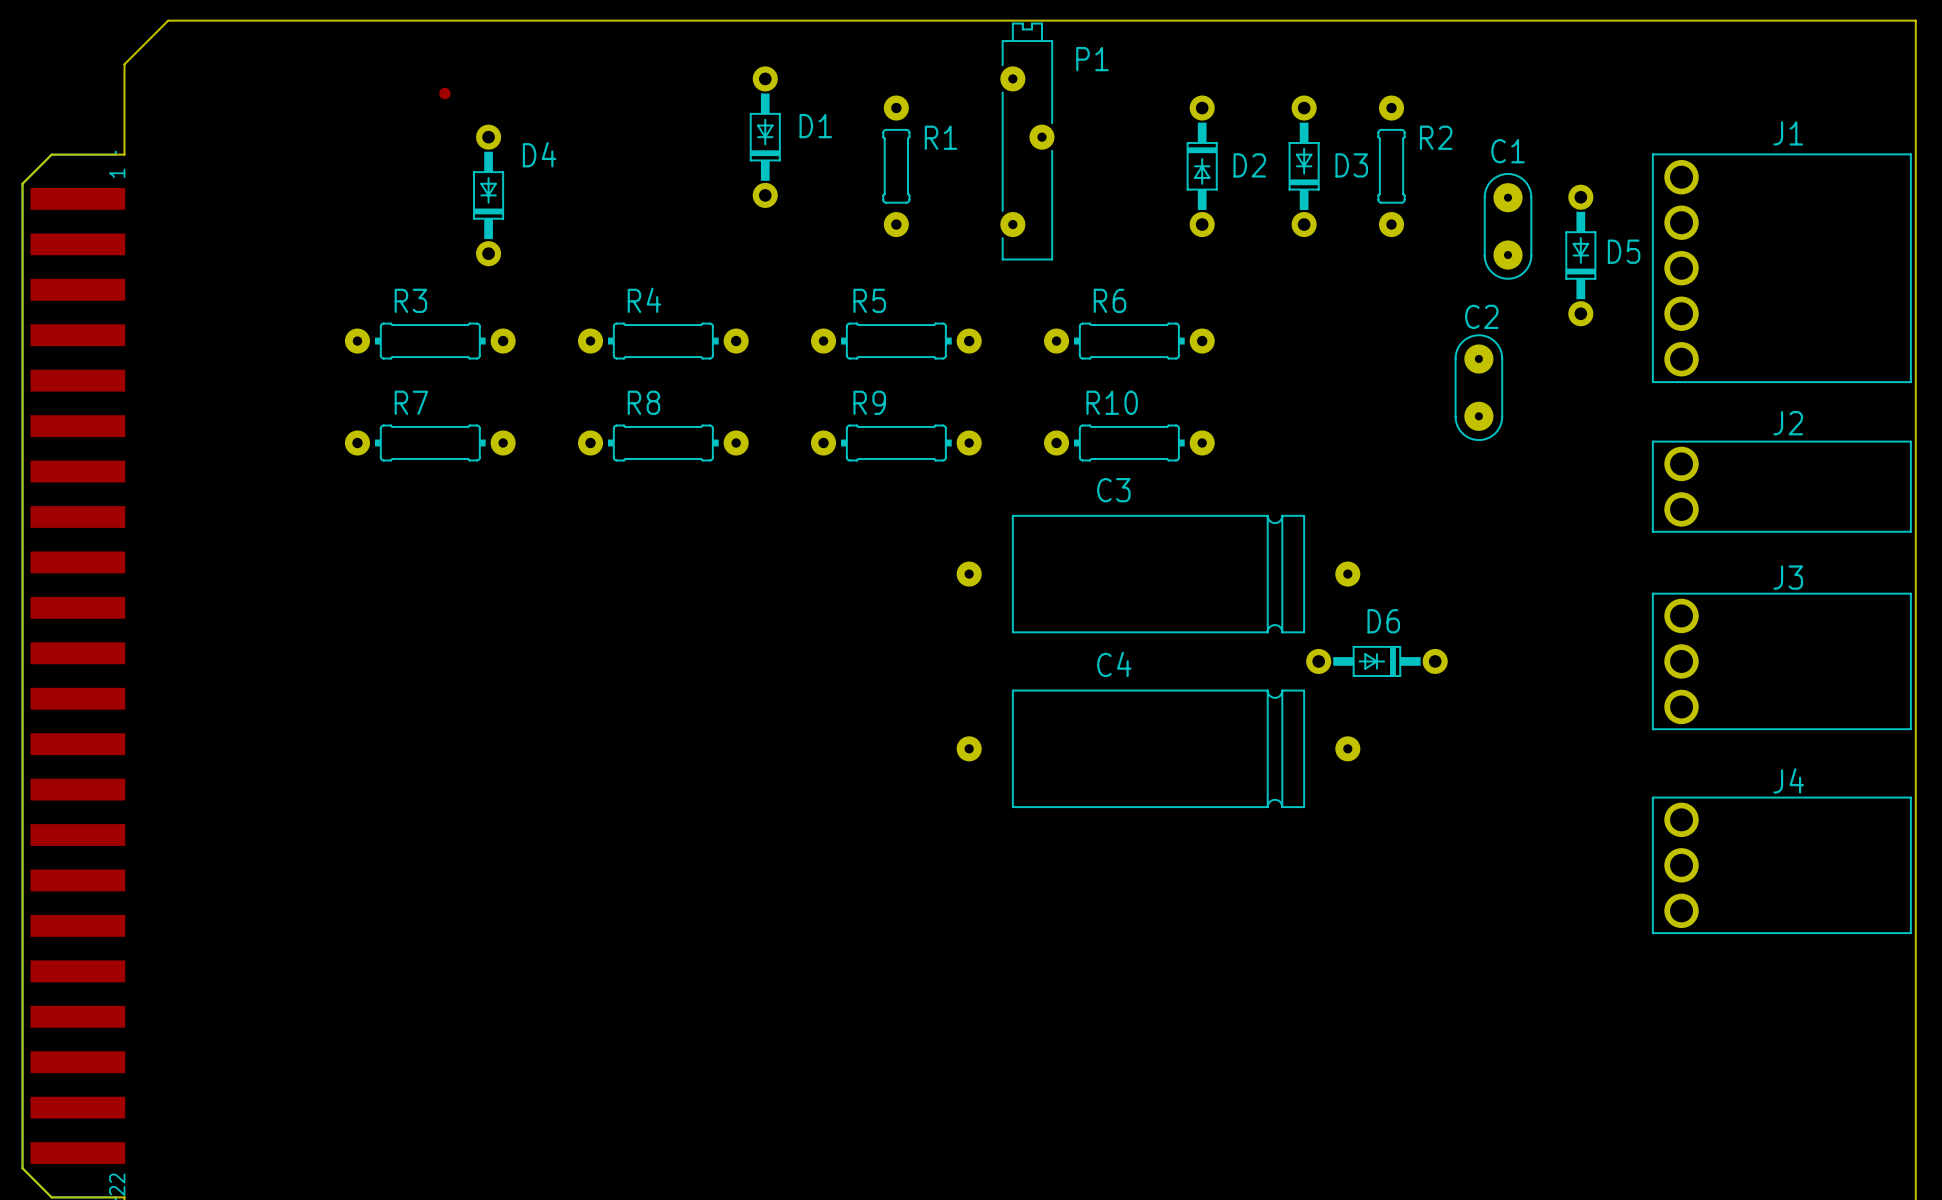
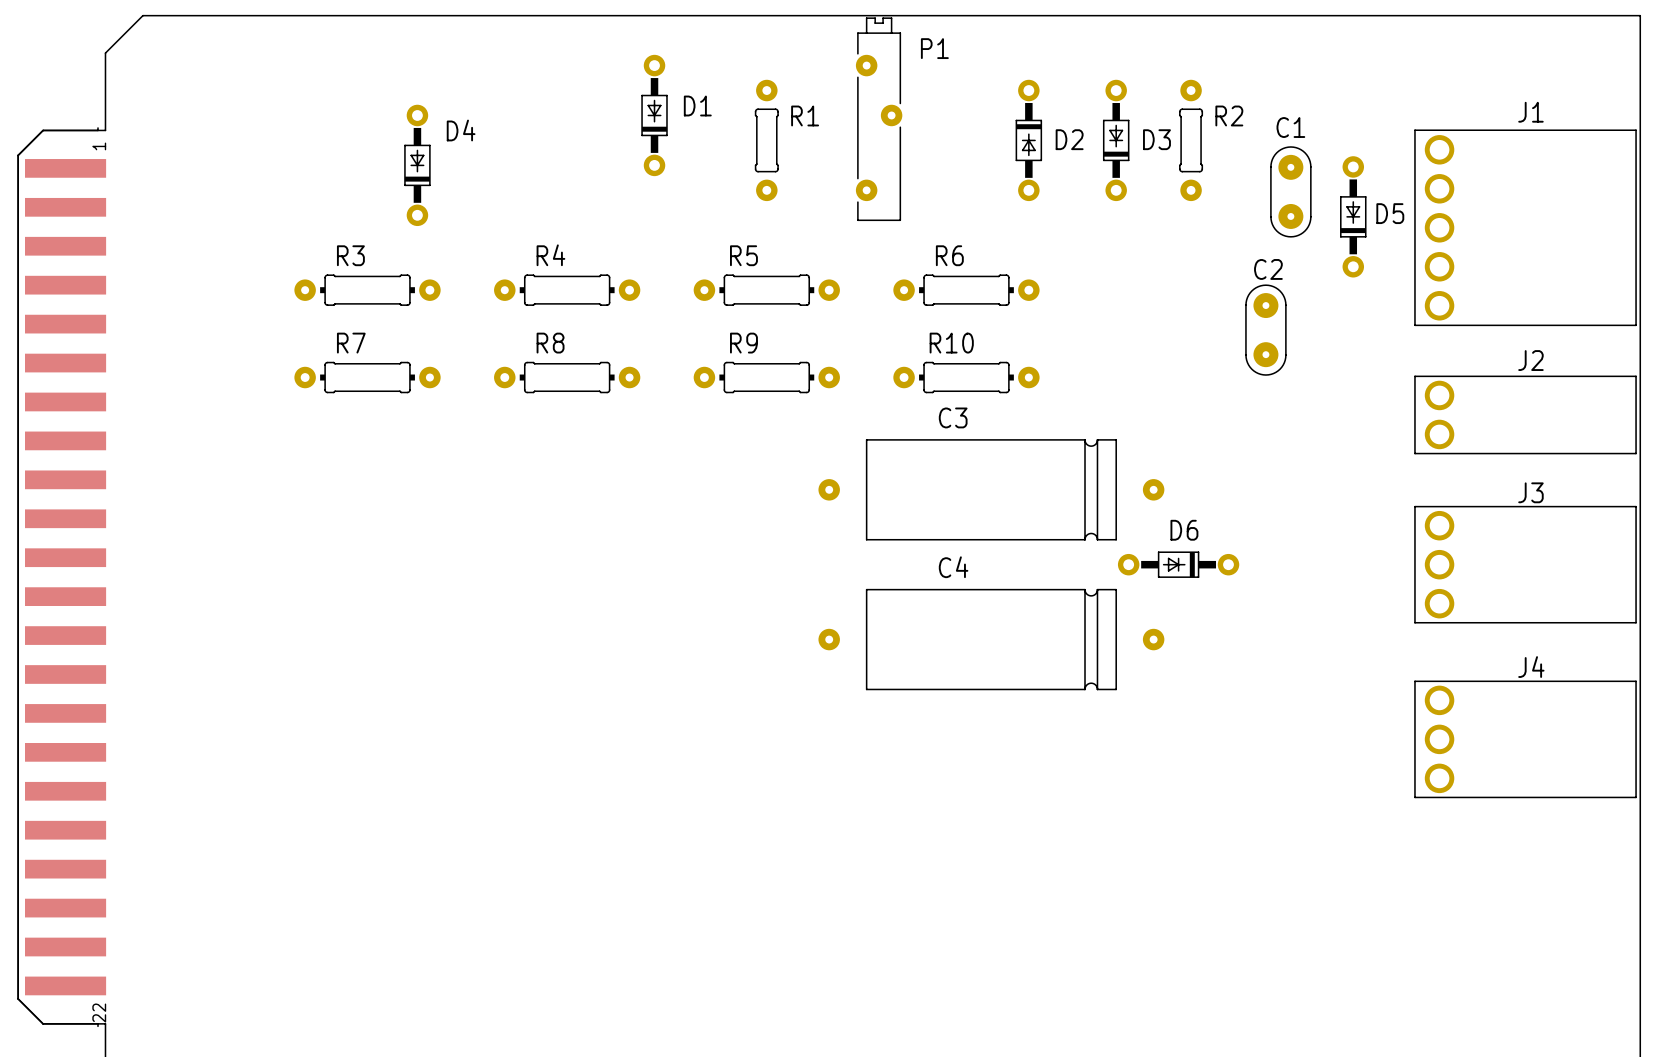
part: (444, 93) -> none

